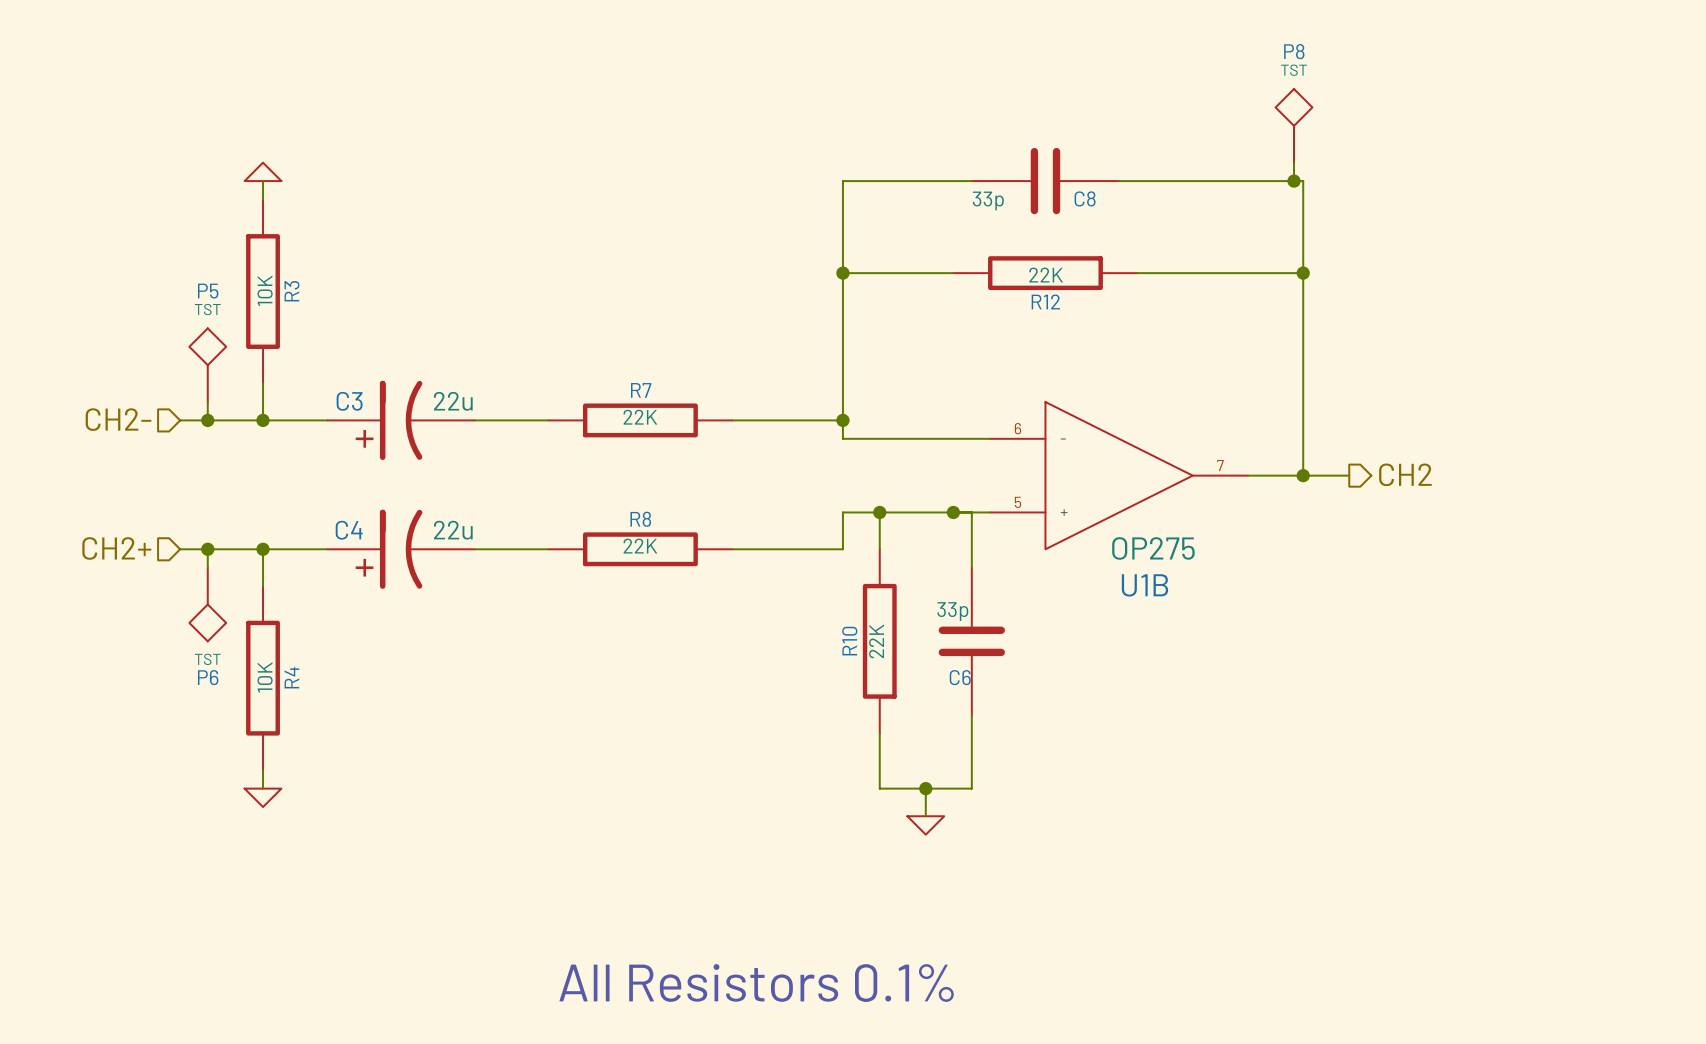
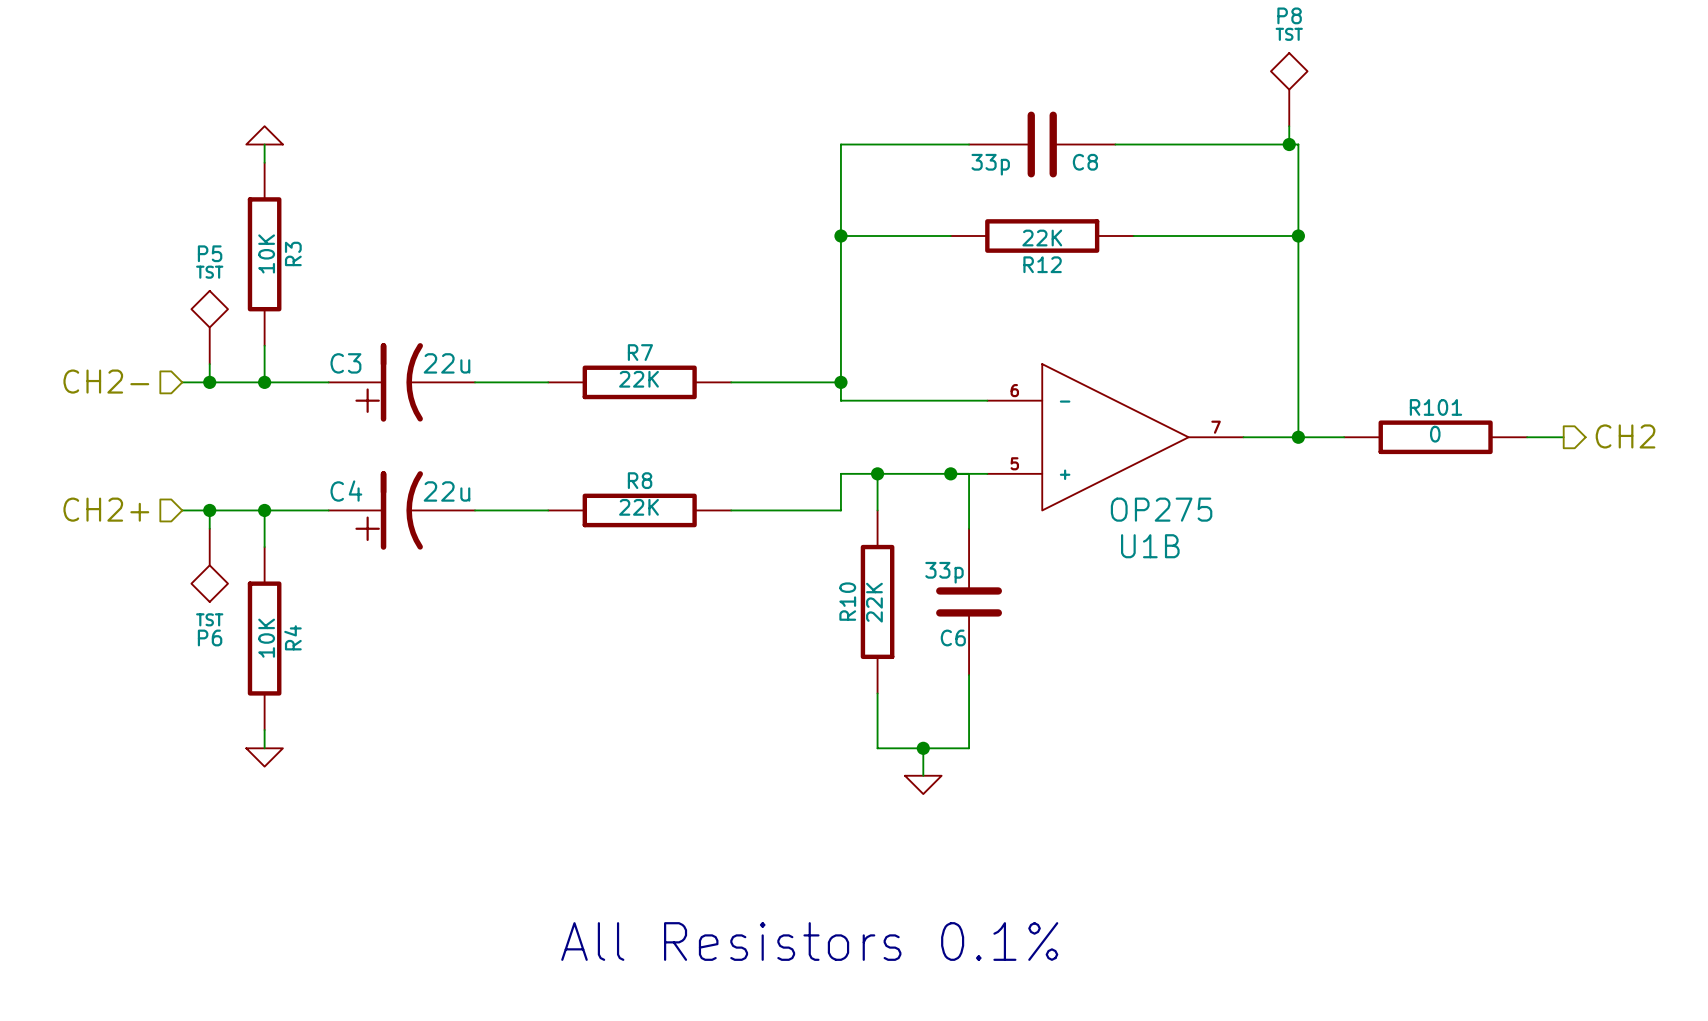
hierarchical label position: CH2 (1405, 474) -> CH2 (1625, 436)
R101: none -> 0 (1435, 437)
wire: none -> (1527, 437) (1563, 437)

